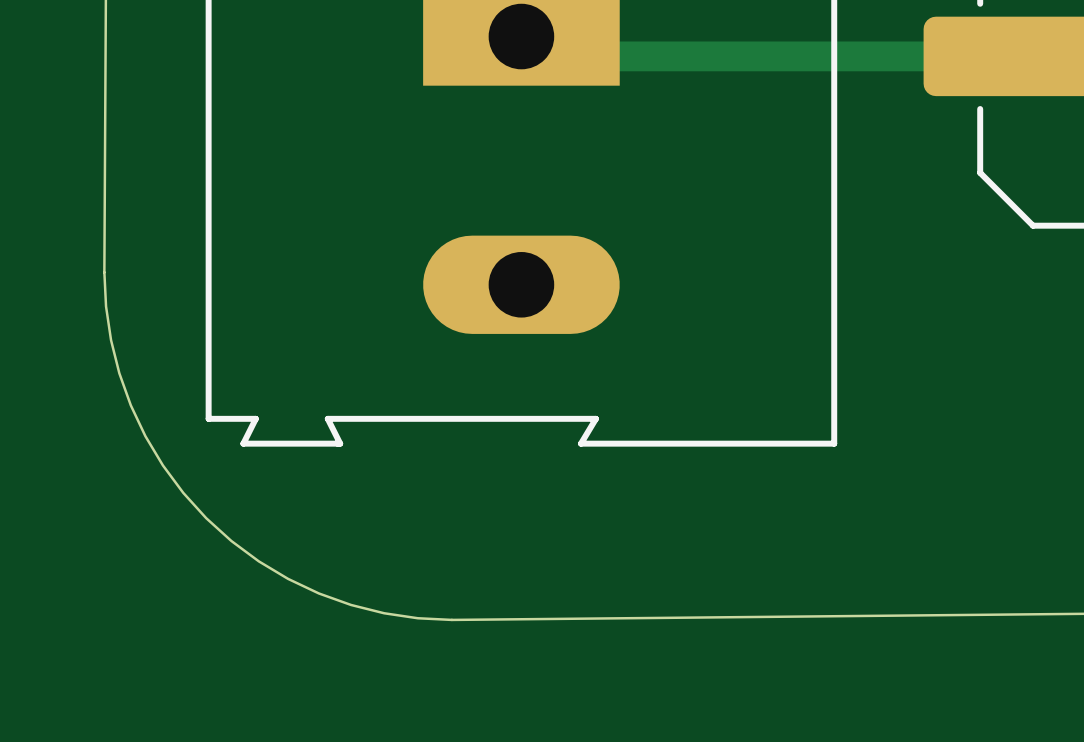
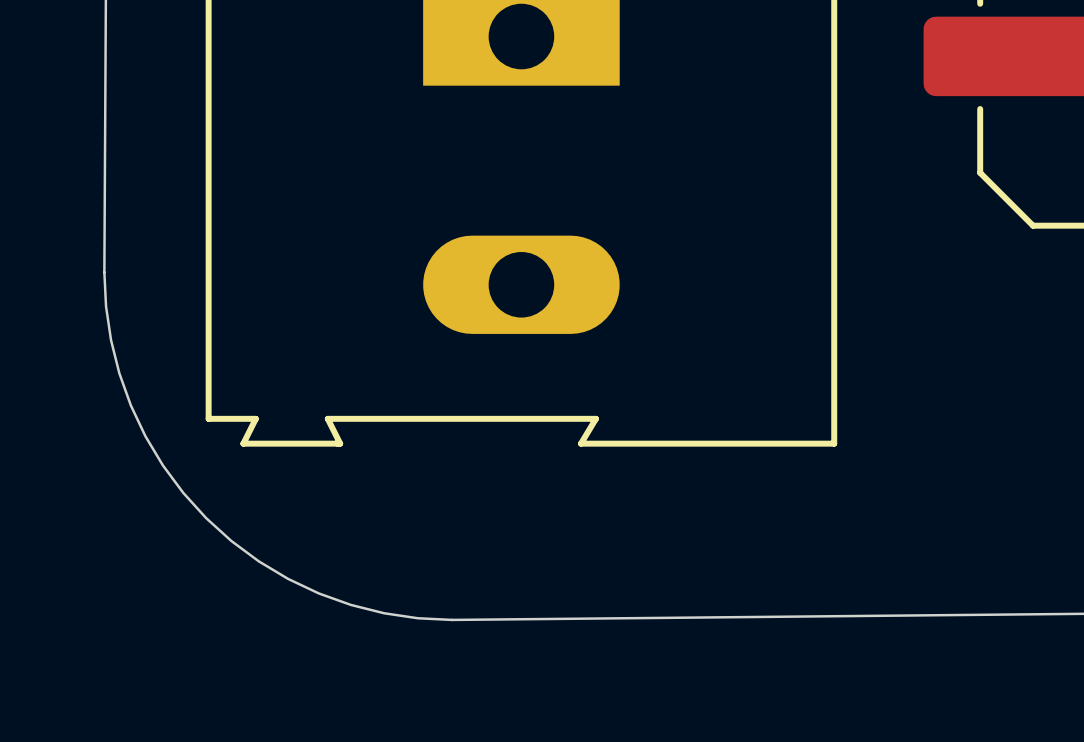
track: (521, 36) (541, 56) (1010, 56) -> none

